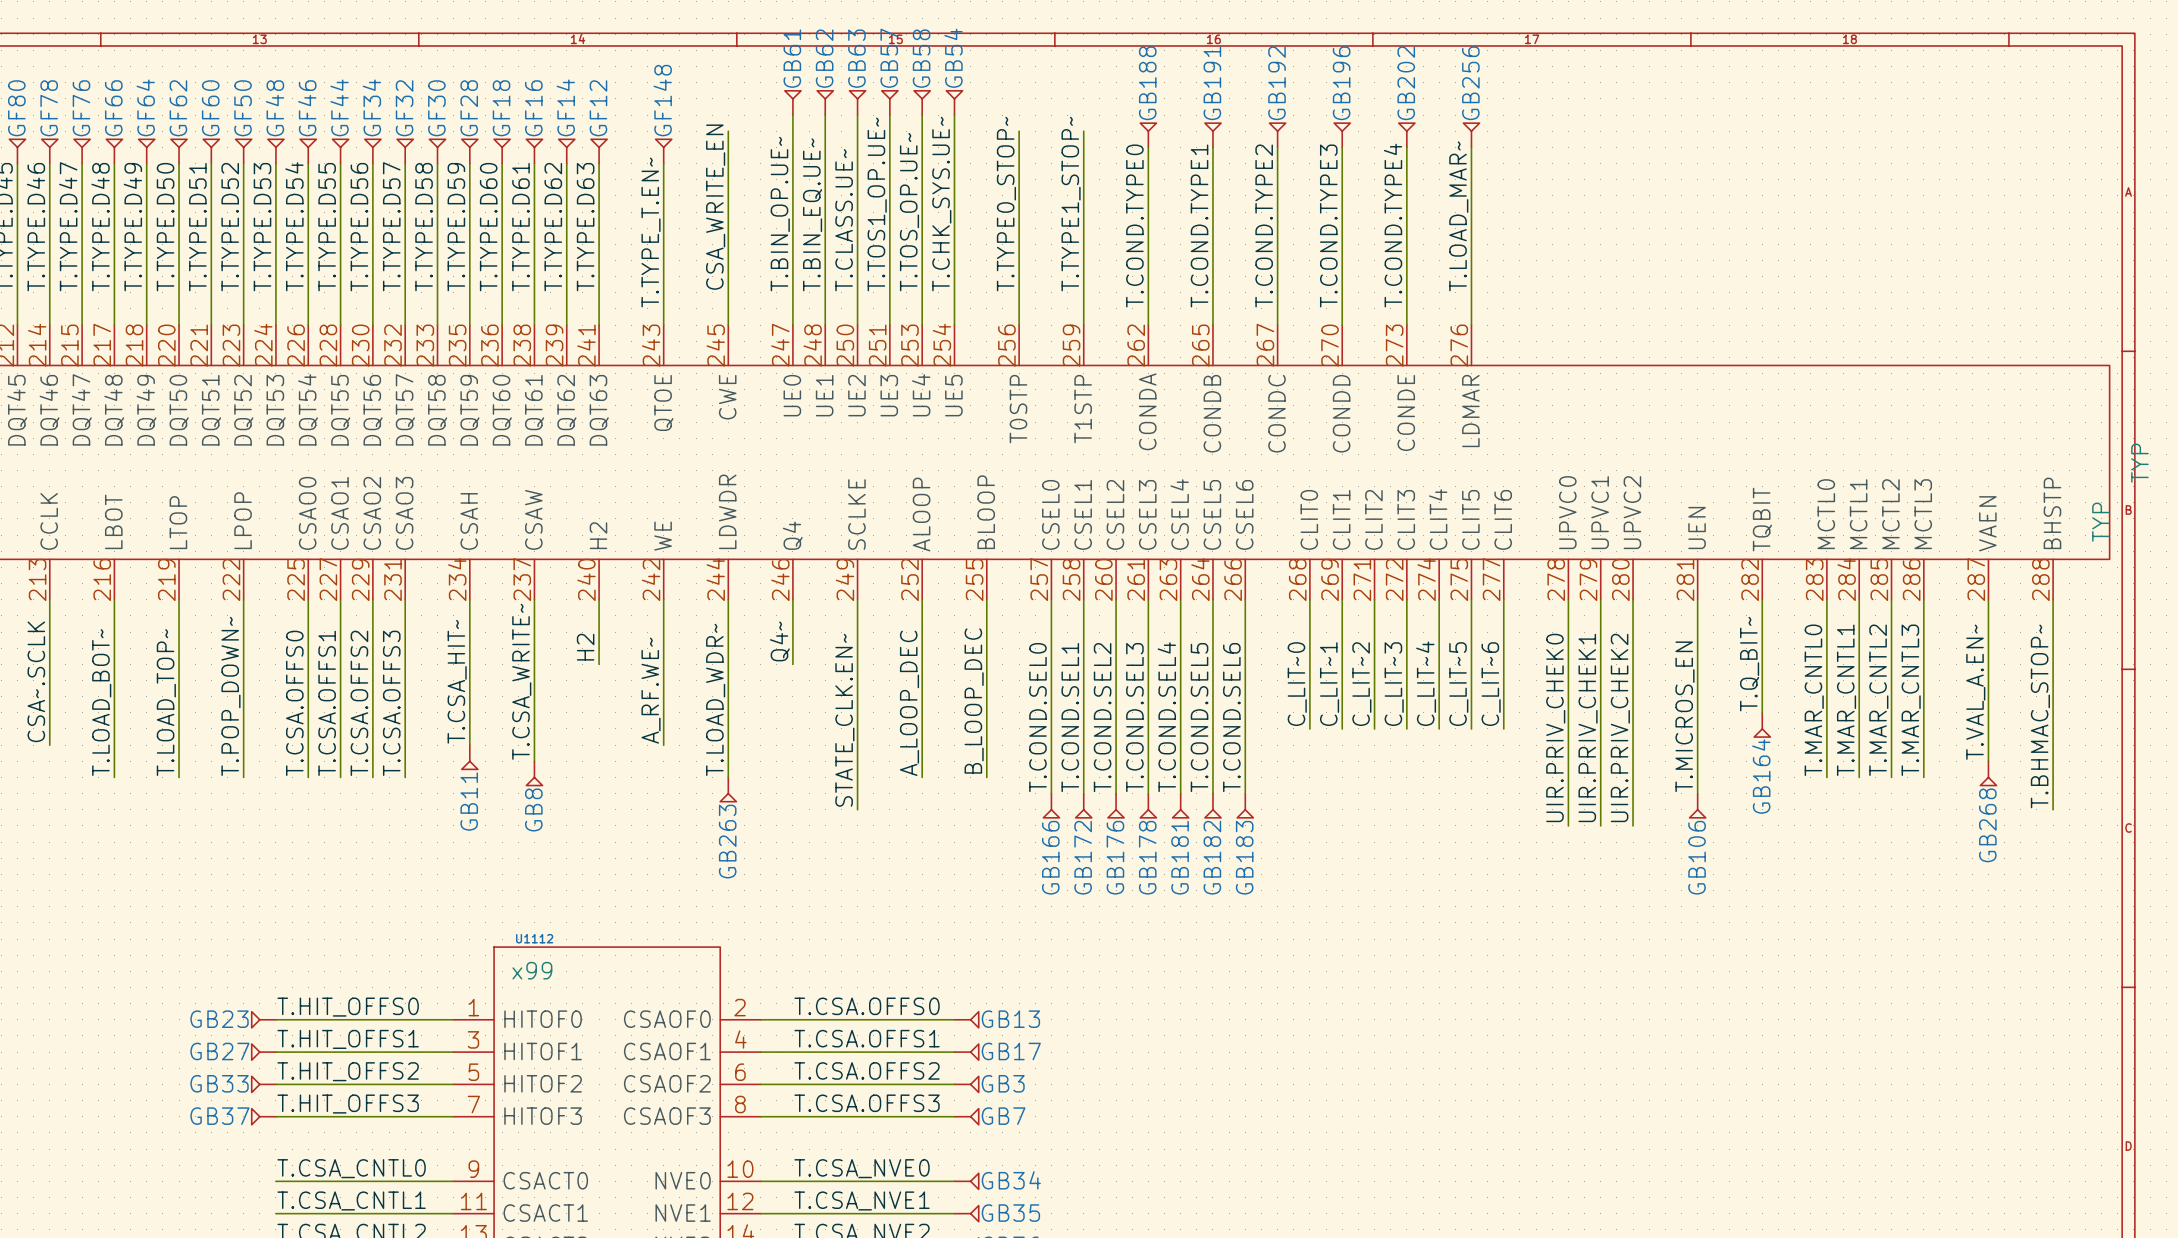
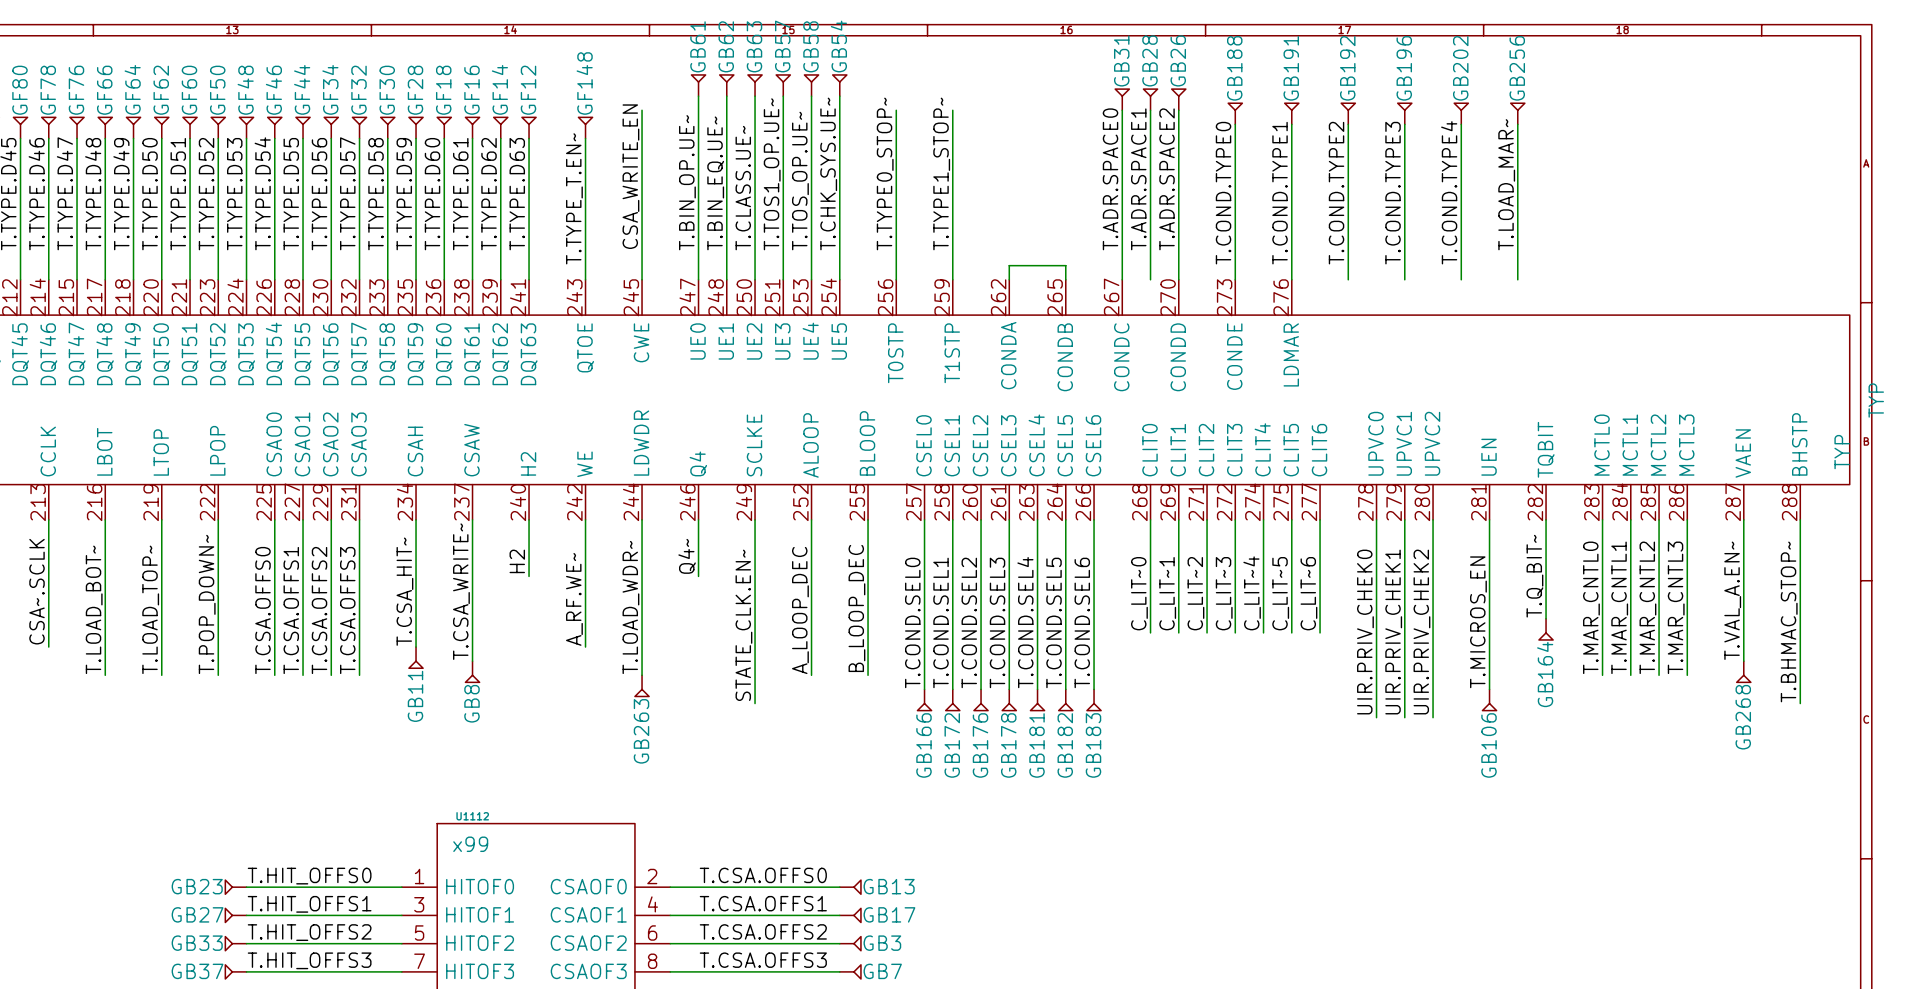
GB202 name: GB202 (1406, 83) -> GB188 (1234, 68)
GB256 name: GB256 (1470, 83) -> GB191 (1291, 68)
GB31: none -> (1122, 99)
GB28: none -> (1150, 99)
GB26: none -> (1178, 99)
wire: none -> (1150, 110) (1150, 279)
GB188: (1148, 135) -> none
GB191: (1212, 135) -> none
GB192 position: (1277, 135) -> (1348, 113)
GB196 position: (1342, 135) -> (1404, 113)
GB202: none -> (1461, 113)
GB256: none -> (1517, 113)
wire: (1148, 147) (1148, 308) -> (1065, 265) (1009, 265)
wire: (1212, 147) (1212, 308) -> none
wire: none -> (1348, 124) (1348, 279)
wire: none -> (1404, 124) (1404, 279)
wire: none -> (1461, 124) (1461, 279)
wire: none -> (1517, 124) (1517, 279)
label: none -> T.ADR.SPACE0 (1110, 179)
label: none -> T.ADR.SPACE1 (1138, 179)
label: none -> T.ADR.SPACE2 (1167, 179)
label: T.LOAD_MAR~ (1458, 216) -> none
label: none -> T.LOAD_MAR~ (1506, 184)
label: T.COND.TYPE0 (1134, 225) -> none
label: T.COND.TYPE1 (1199, 225) -> none
label: T.COND.TYPE2 (1264, 225) -> none
label: T.COND.TYPE3 (1328, 225) -> none
label: T.COND.TYPE4 (1393, 225) -> T.COND.TYPE0 (1223, 193)
label: none -> T.COND.TYPE1 (1280, 193)
label: none -> T.COND.TYPE2 (1336, 193)
label: none -> T.COND.TYPE3 (1393, 193)
label: none -> T.COND.TYPE4 (1449, 192)

